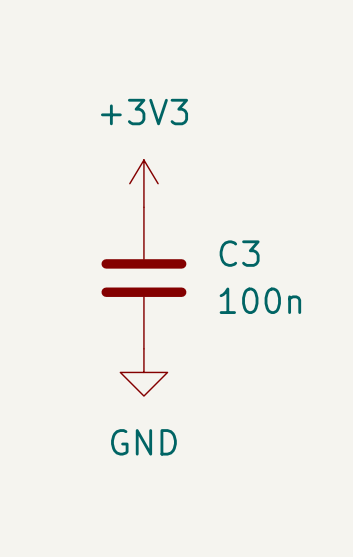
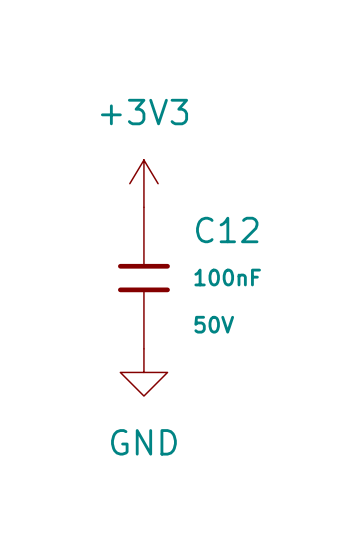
C3: 100n (143, 278) -> none
C12: none -> 100nF (143, 278)

